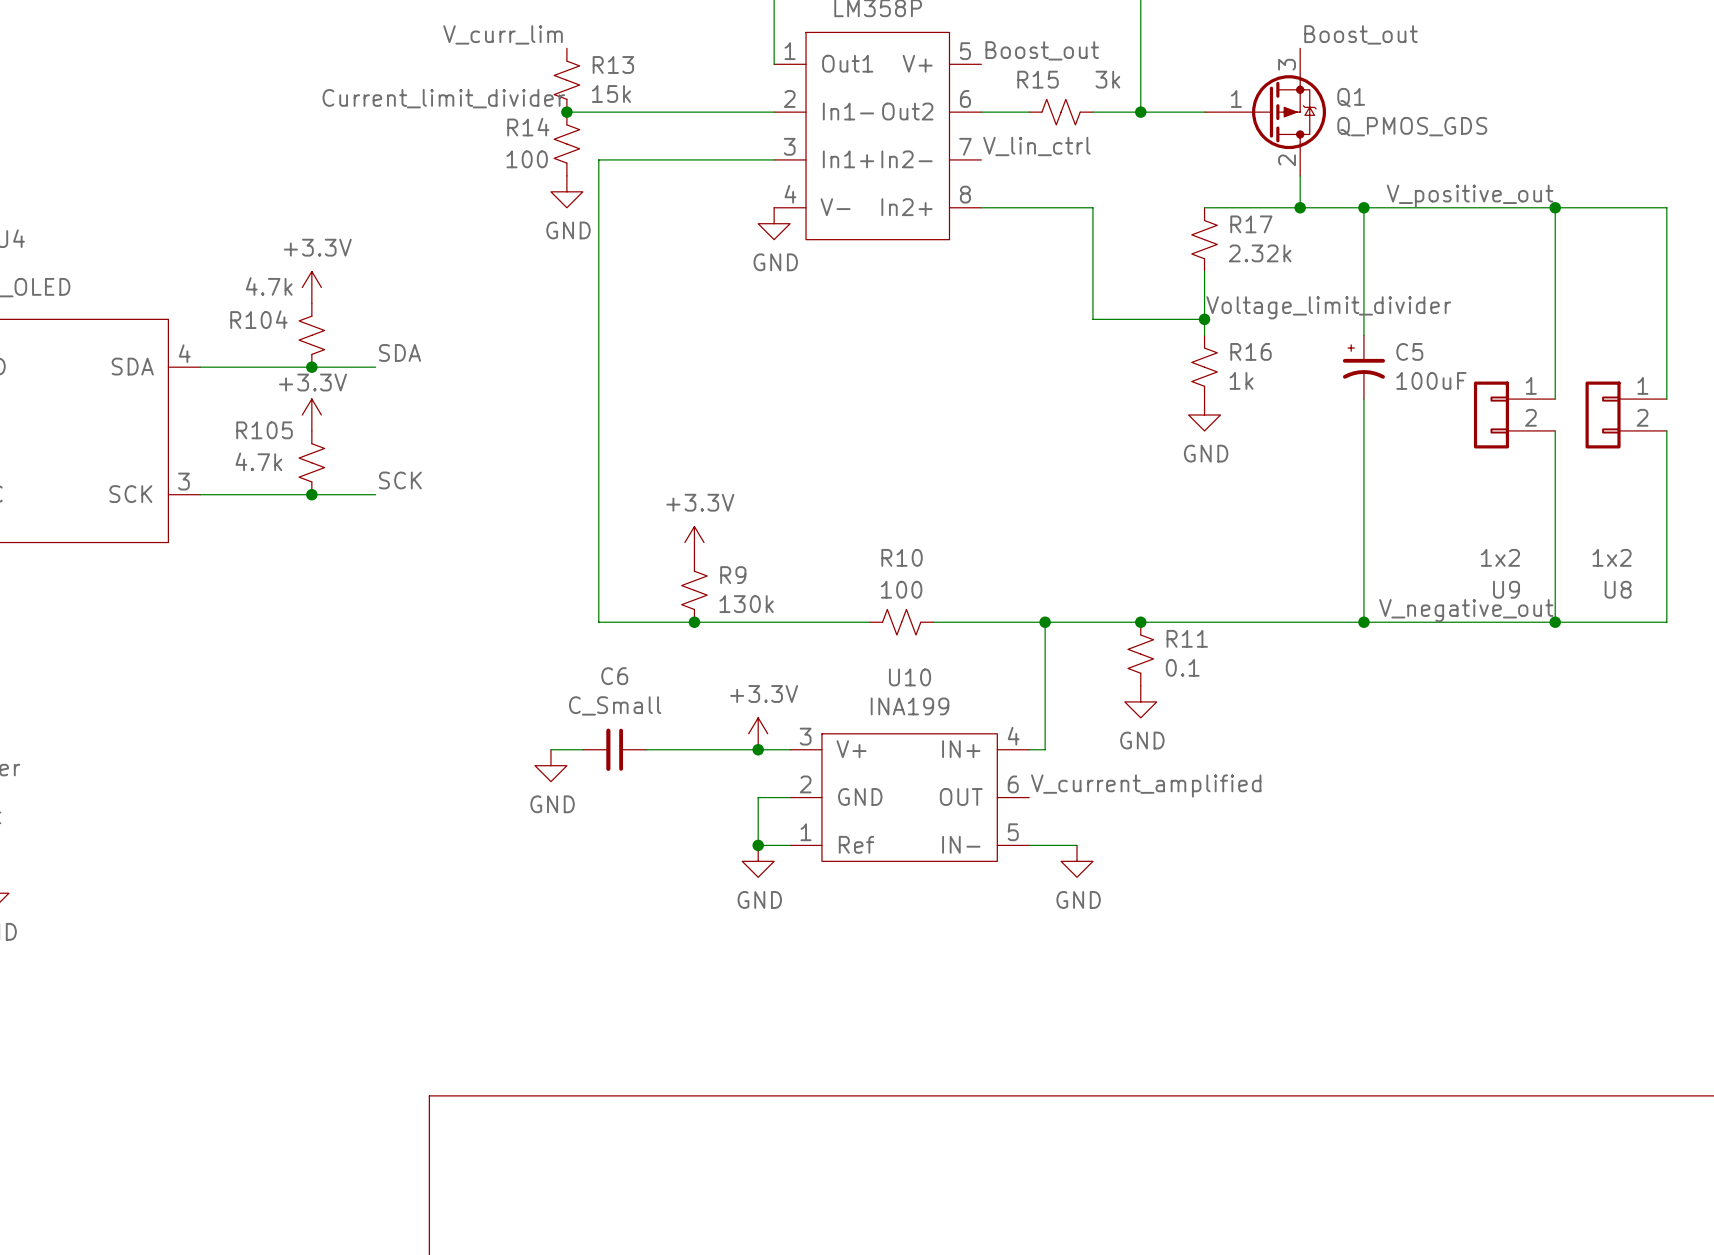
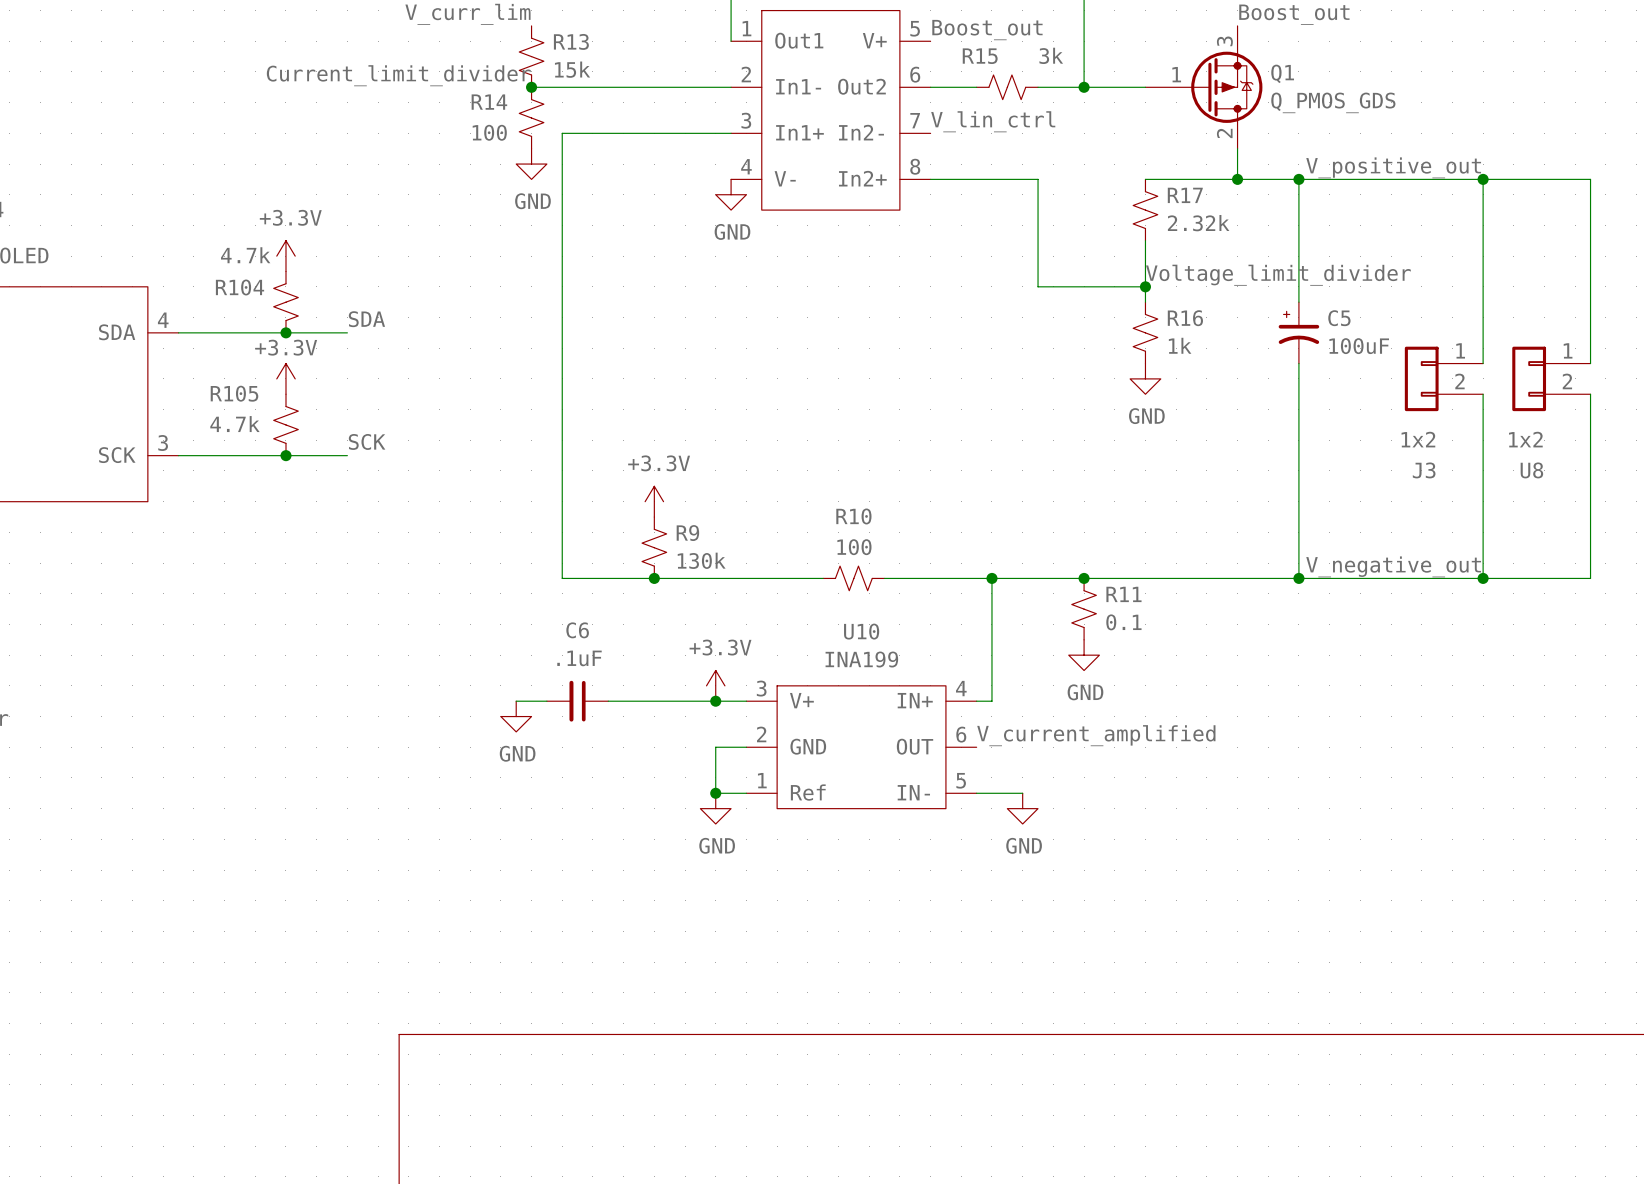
U9 value position: 1x2 (1500, 557) -> 1x2 (1418, 439)
U8 value position: 1x2 (1612, 557) -> 1x2 (1525, 439)
U9 name: U9 (1506, 589) -> J3 (1424, 470)
U8 name position: U8 (1618, 589) -> U8 (1531, 470)
C6 value: C_Small (615, 705) -> .1uF (579, 658)

